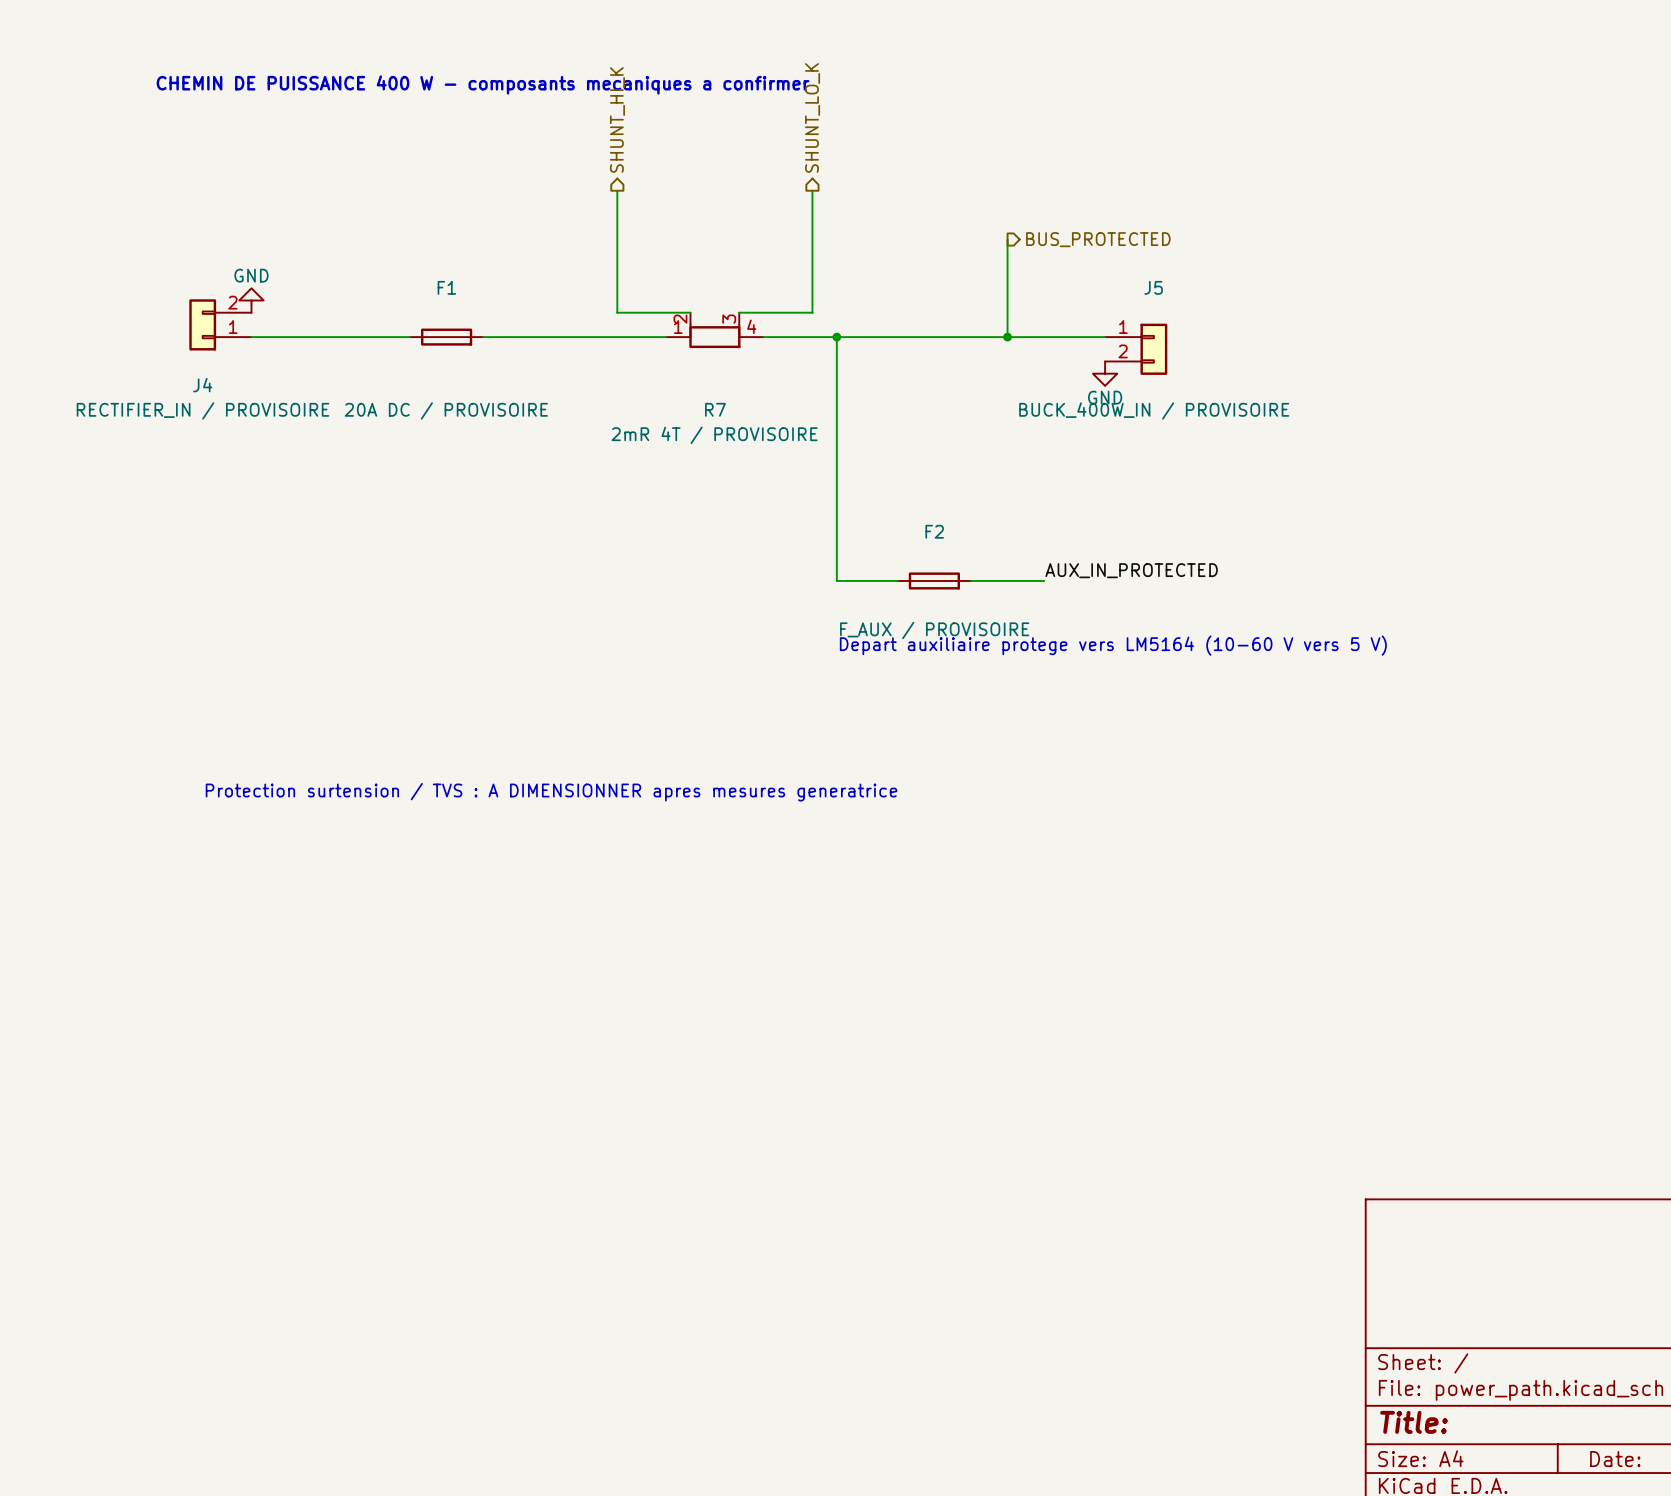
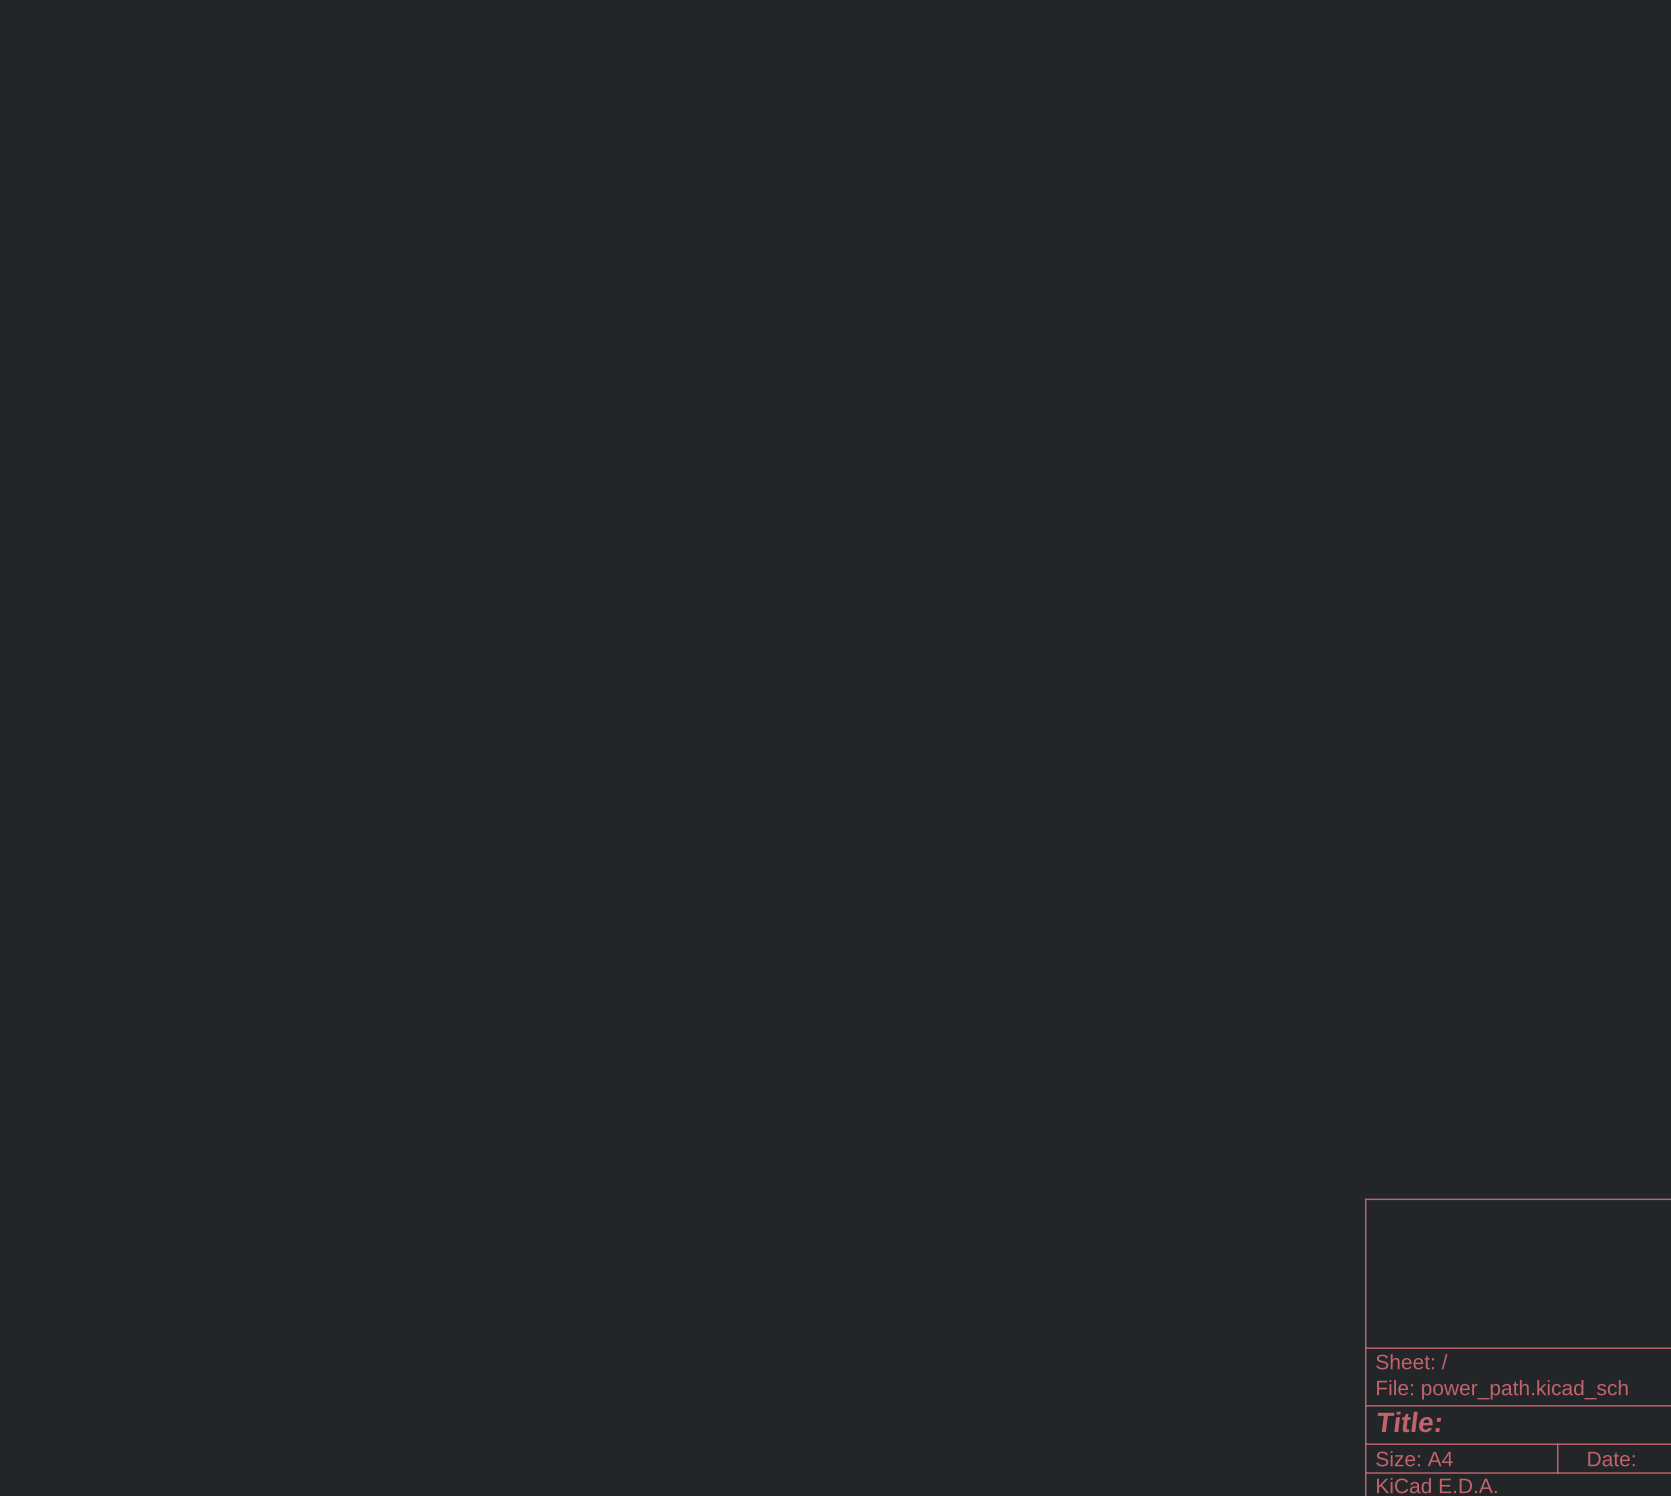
text: CHEMIN DE PUISSANCE 400 W - composants mecaniques a confirmer (483, 84) -> none
hierarchical label: SHUNT_LO_K (812, 117) -> none
hierarchical label: SHUNT_HI_K (617, 120) -> none
wire: (617, 190) (617, 312) (690, 312) -> none
wire: (812, 190) (812, 312) (739, 312) -> none
wire: (1007, 239) (1007, 337) -> none
hierarchical label: BUS_PROTECTED (1098, 239) -> none
power symbol: GND (251, 300) -> none
J4: RECTIFIER_IN / PROVISOIRE (220, 324) -> none
R7: 2mR 4T / PROVISOIRE (714, 330) -> none
wire: (251, 337) (410, 337) -> none
F1: 20A DC / PROVISOIRE (446, 337) -> none
wire: (483, 337) (666, 337) -> none
wire: (763, 337) (1105, 337) -> none
wire: (836, 337) (836, 580) (897, 580) -> none
junction: (836, 337) -> none
junction: (1007, 337) -> none
J5: BUCK_400W_IN / PROVISOIRE (1136, 349) -> none
power symbol: GND (1105, 373) -> none
label: AUX_IN_PROTECTED (1131, 570) -> none
F2: F_AUX / PROVISOIRE (934, 580) -> none
wire: (970, 580) (1044, 580) -> none
text: Depart auxiliaire protege vers LM5164 (10-60 V vers 5 V) (1113, 645) -> none
text: Protection surtension / TVS : A DIMENSIONNER apres mesures generatrice (551, 792) -> none

